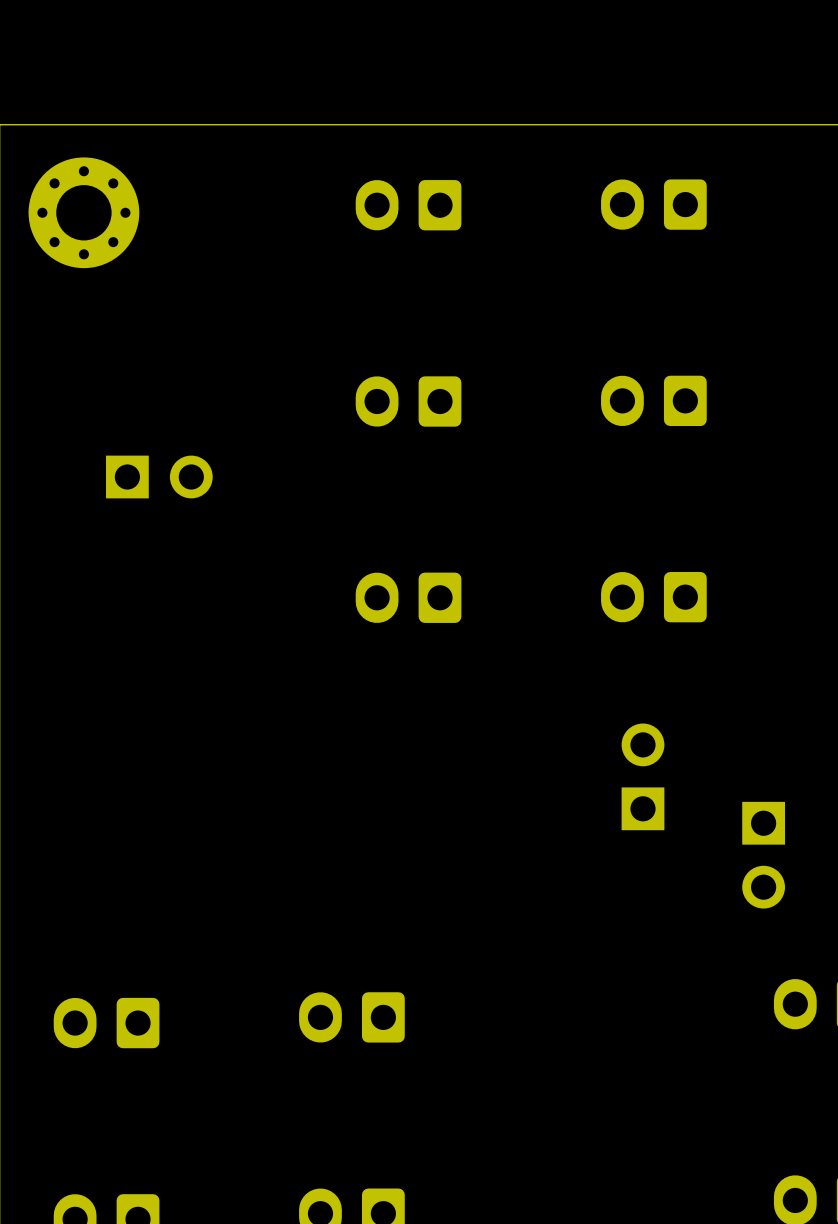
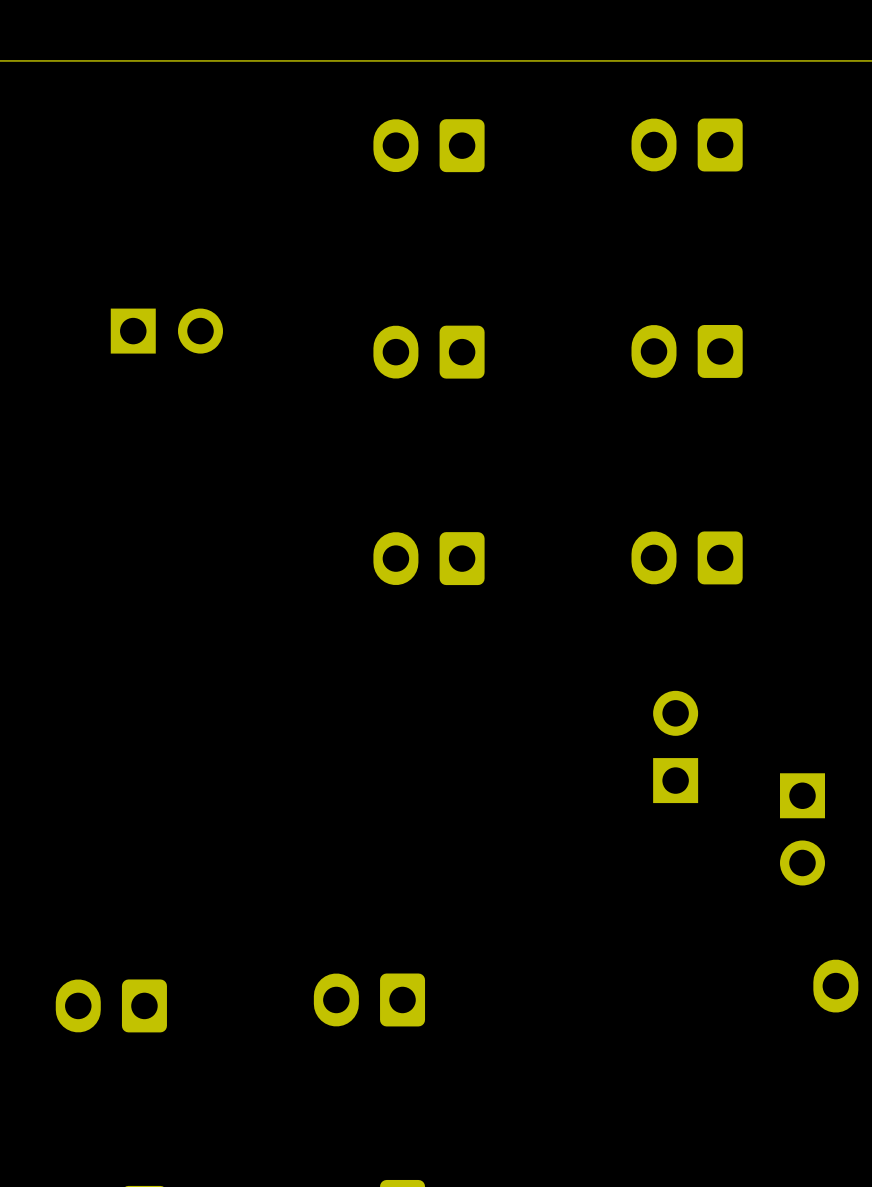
part: (83, 212) -> none
part position: (159, 476) -> (166, 331)

